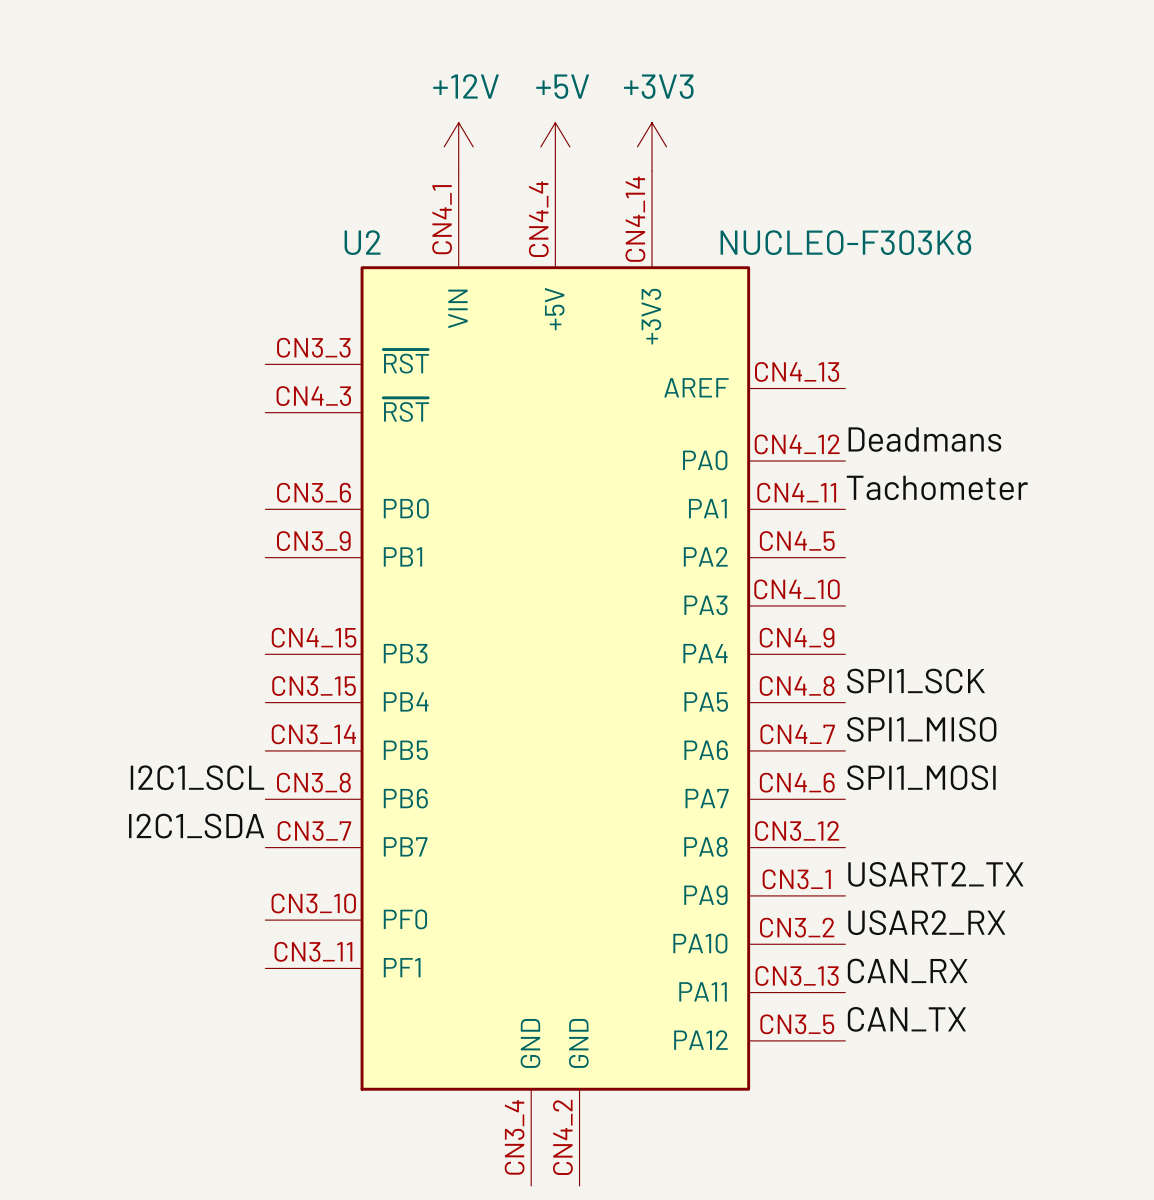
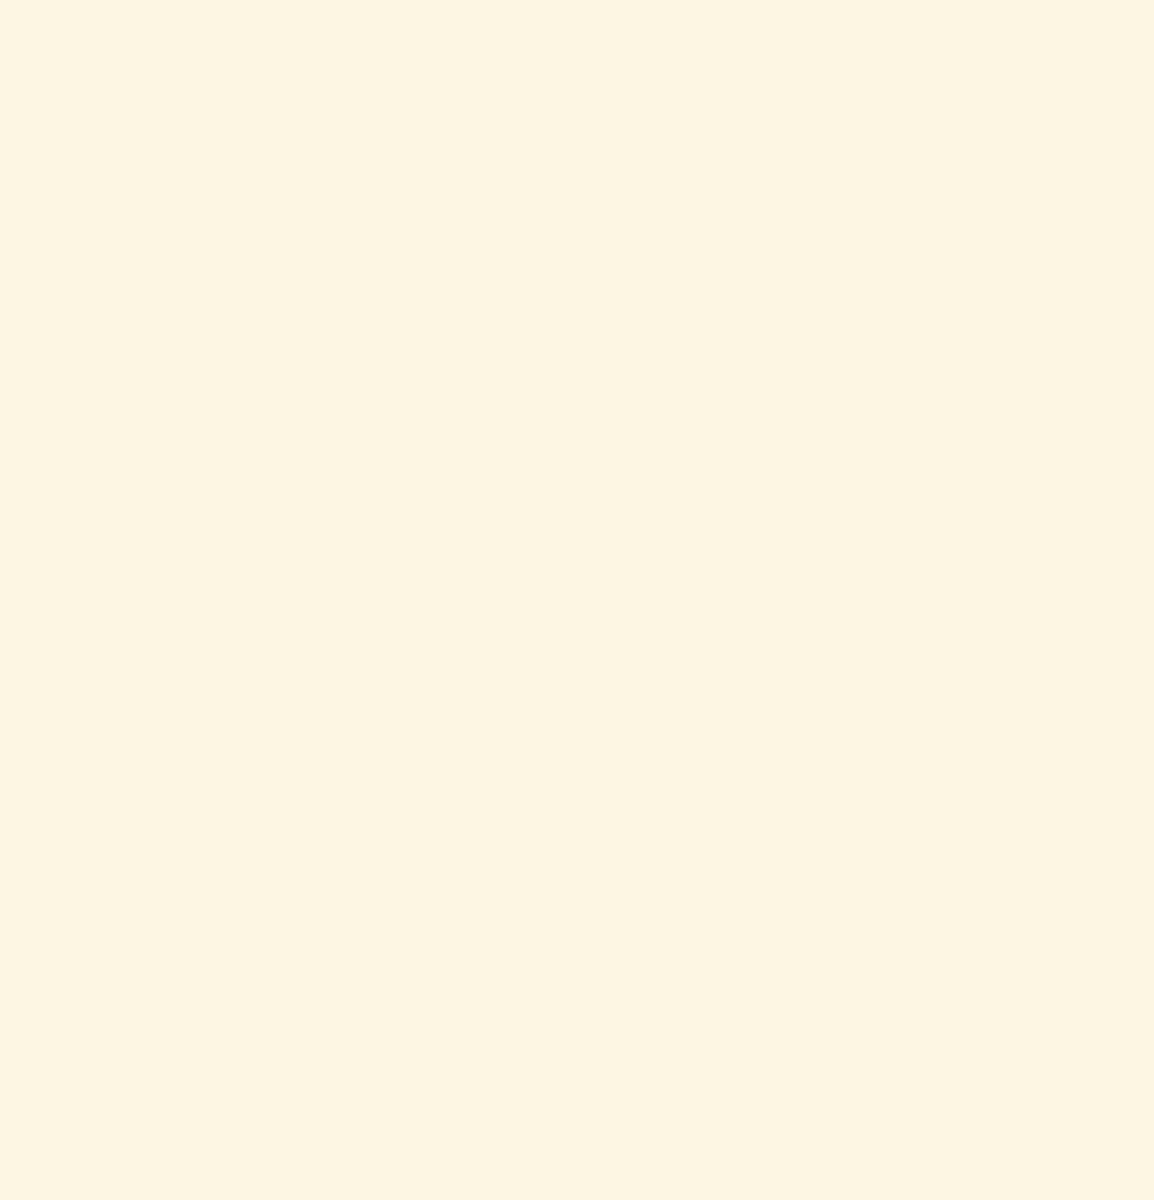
power symbol: +12V (458, 146) -> none
power symbol: +5V (555, 146) -> none
power symbol: +3V3 (652, 146) -> none
label: Deadmans (924, 439) -> none
label: Tachometer (937, 487) -> none
U2: NUCLEO-F303K8 (555, 678) -> none
label: SPI1_SCK (916, 681) -> none
label: SPI1_MISO (921, 729) -> none
label: I2C1_SCL (197, 777) -> none
label: SPI1_MOSI (921, 777) -> none
label: I2C1_SDA (196, 826) -> none
label: USART2_TX (935, 874) -> none
label: USAR2_RX (926, 922) -> none
label: CAN_RX (907, 971) -> none
label: CAN_TX (906, 1019) -> none

